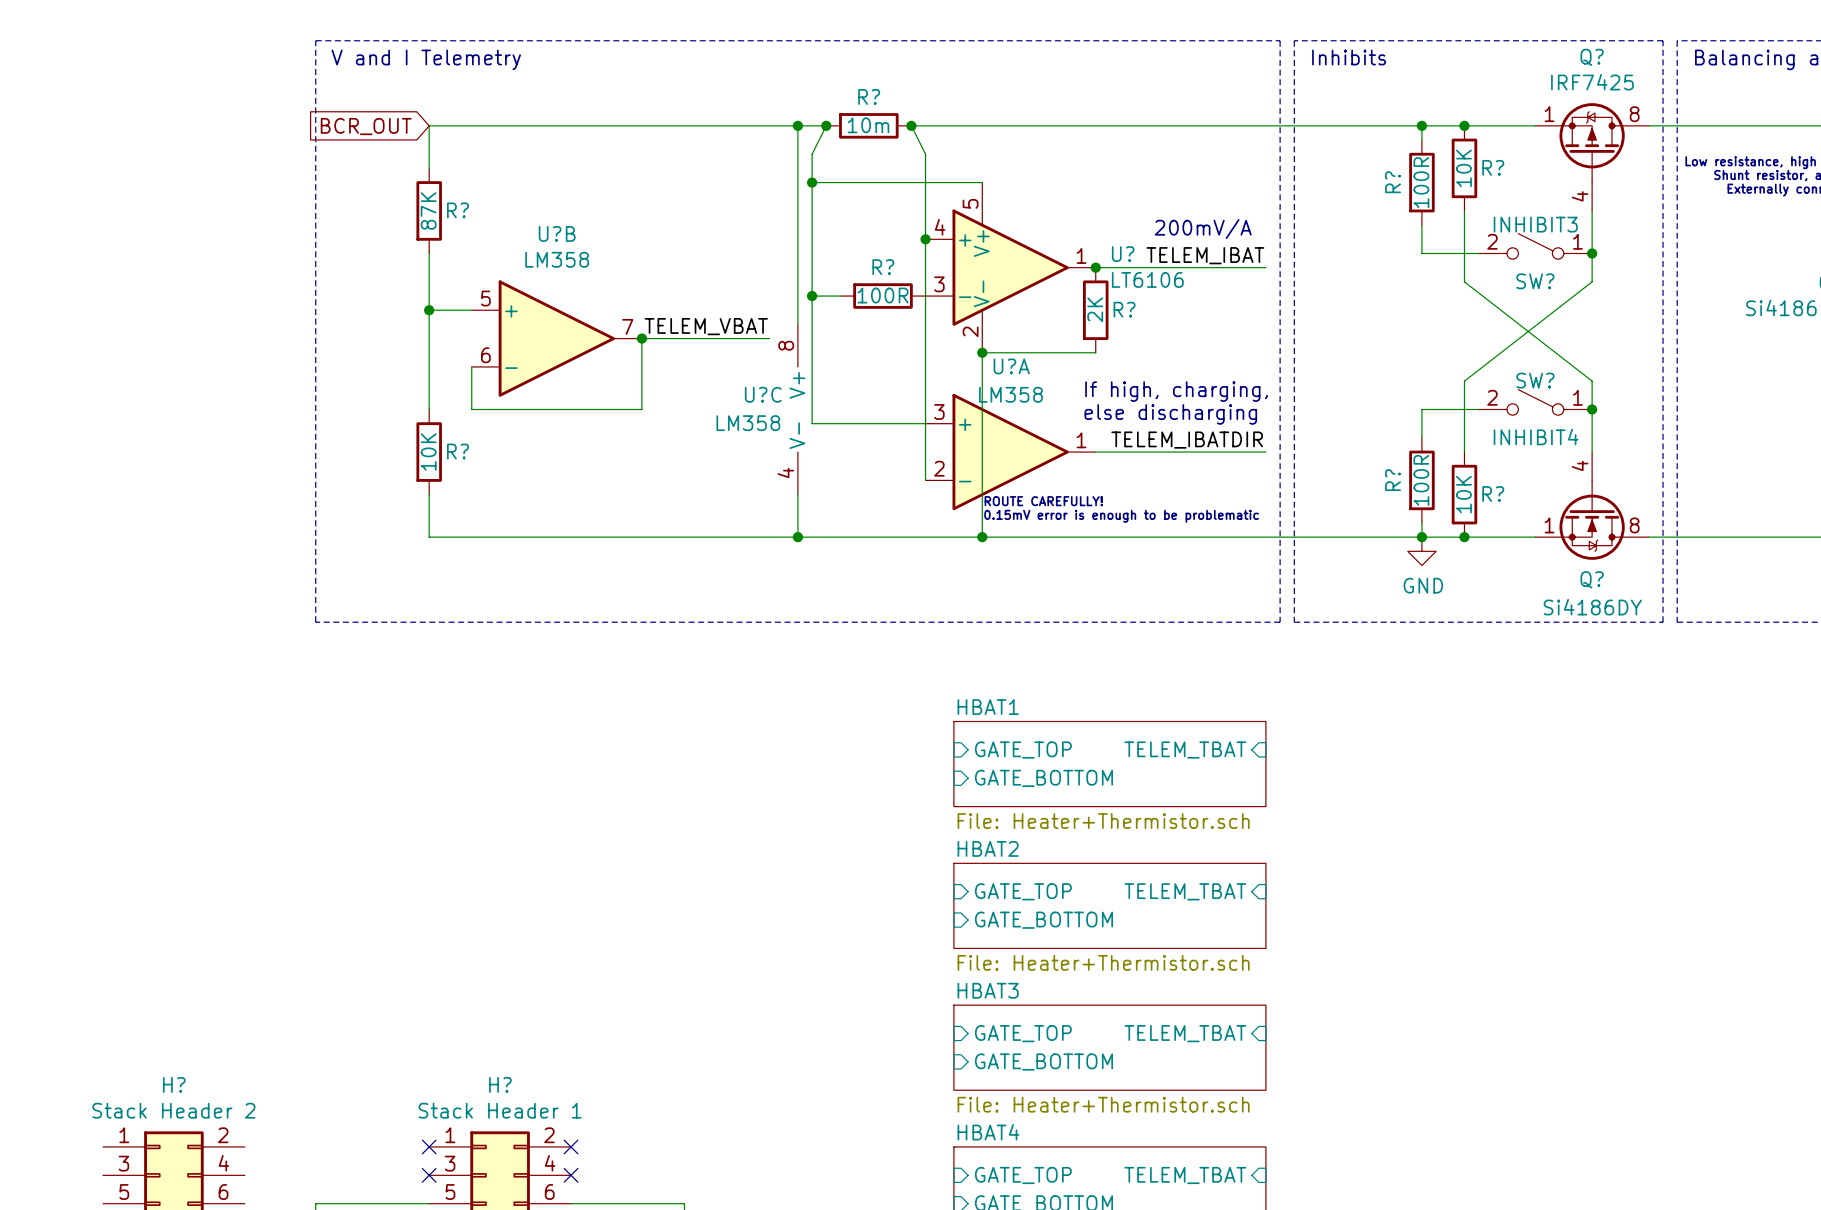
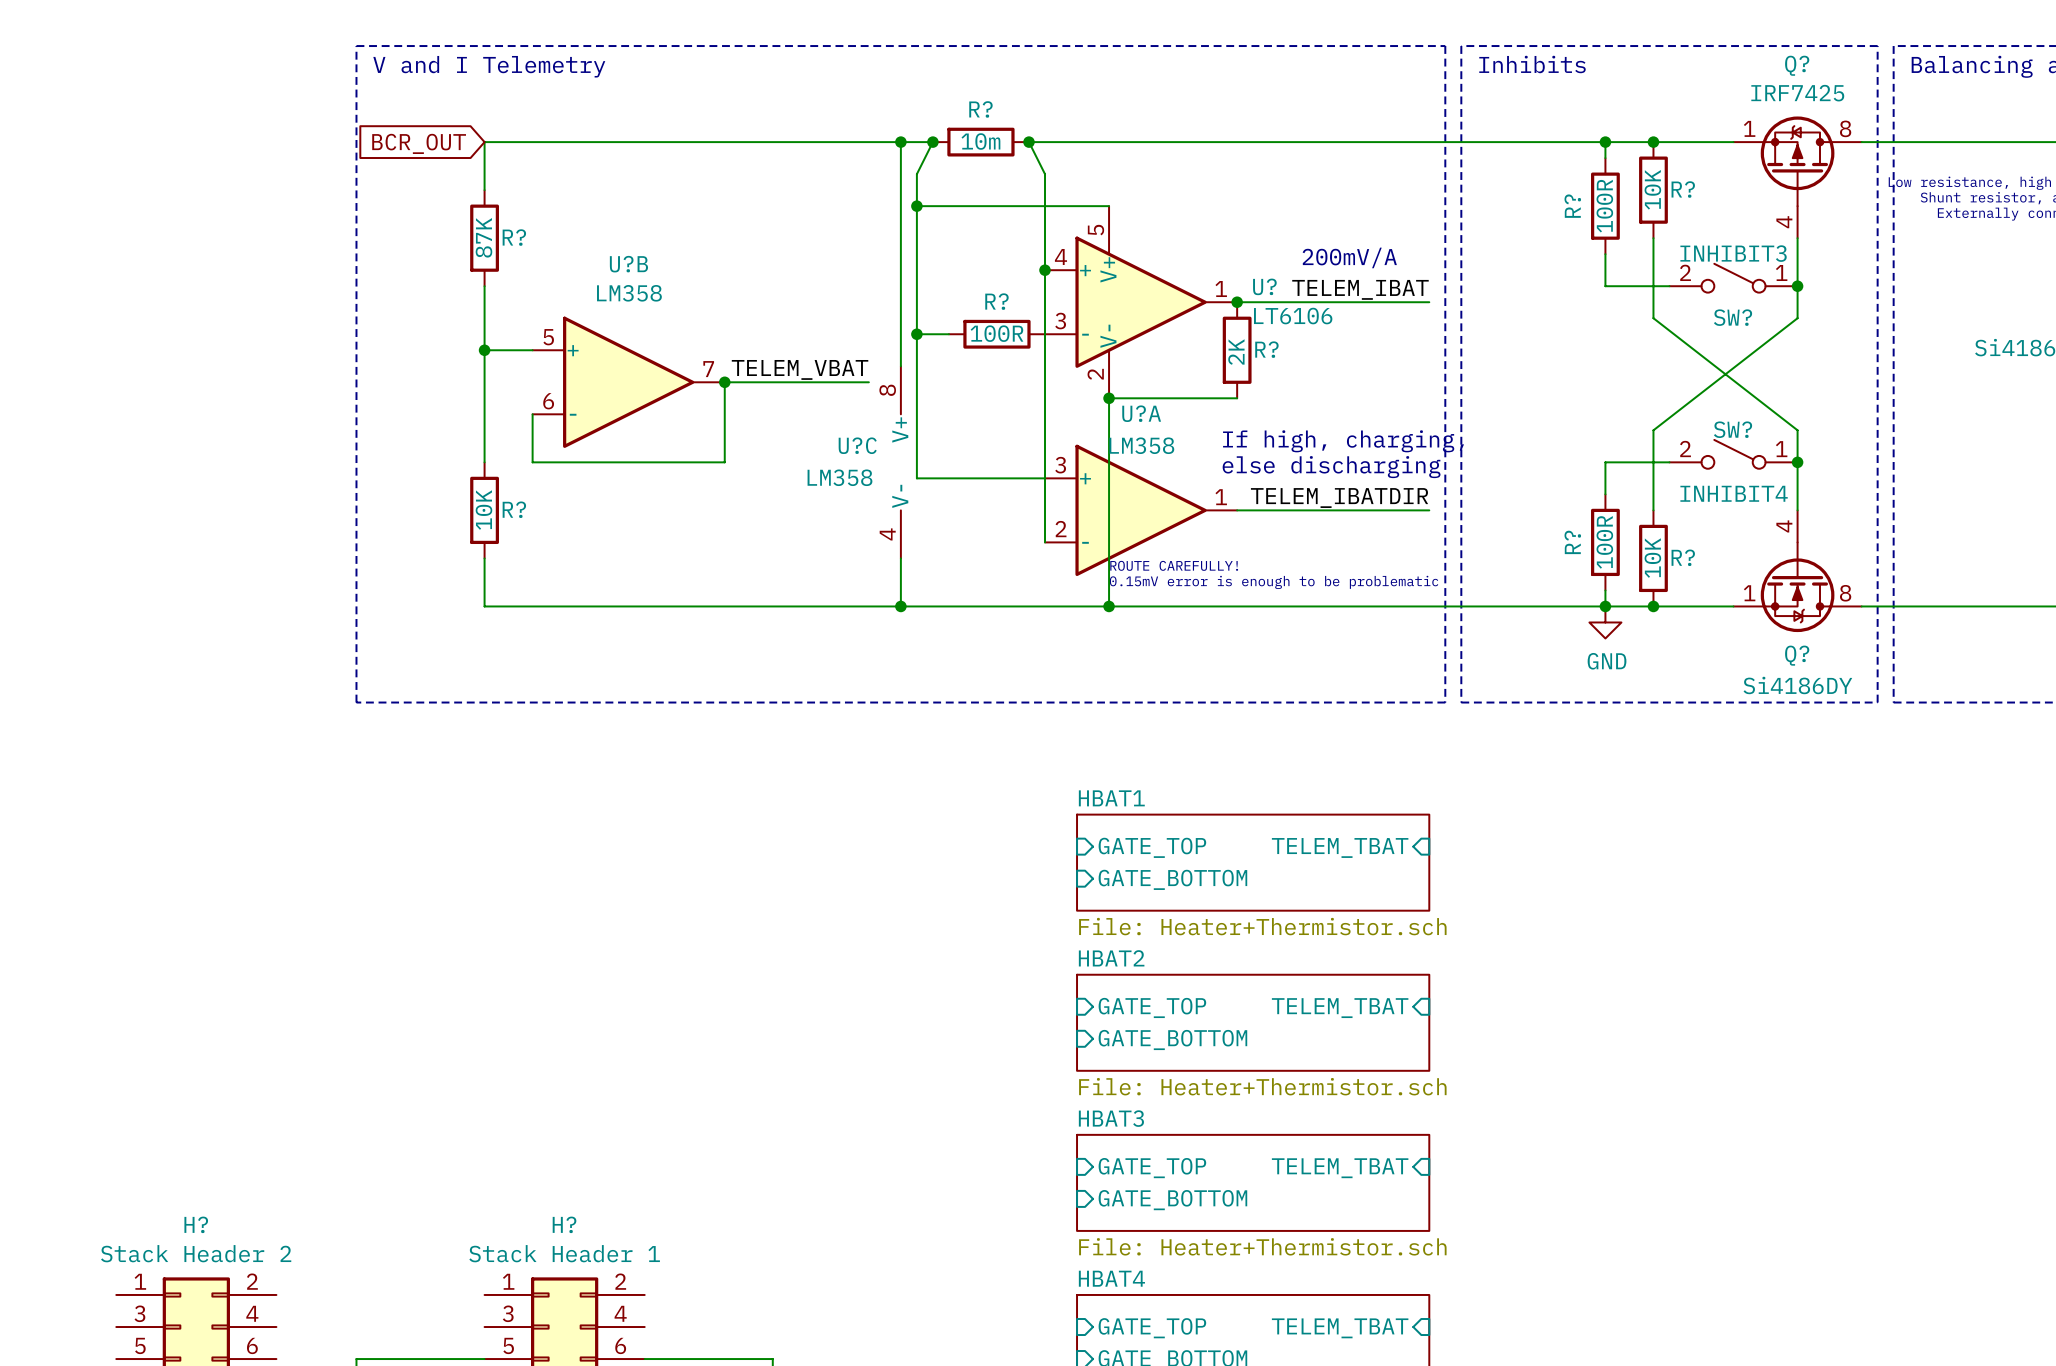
no-connect mark: (429, 1146) -> none
no-connect mark: (571, 1146) -> none
no-connect mark: (429, 1175) -> none
no-connect mark: (571, 1175) -> none

